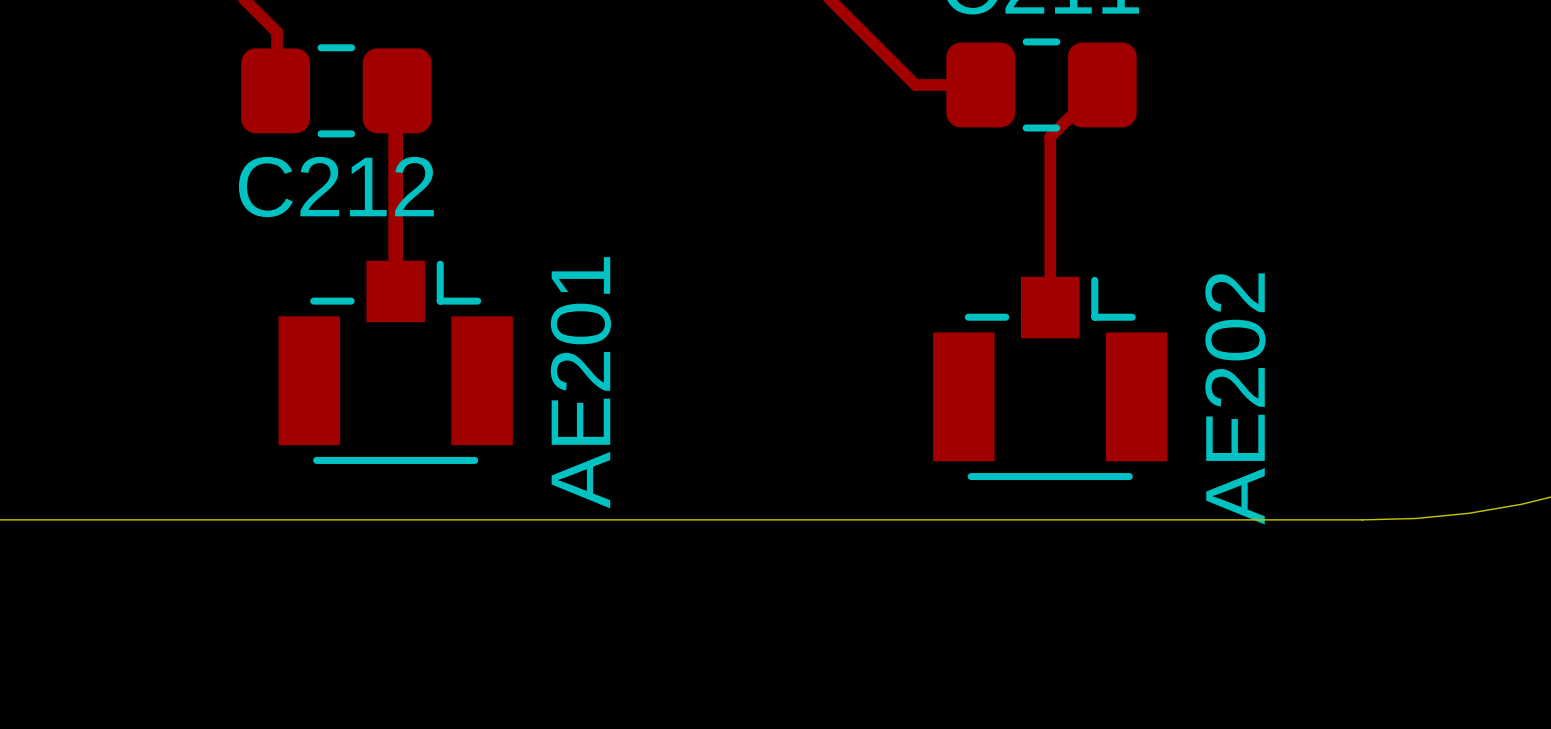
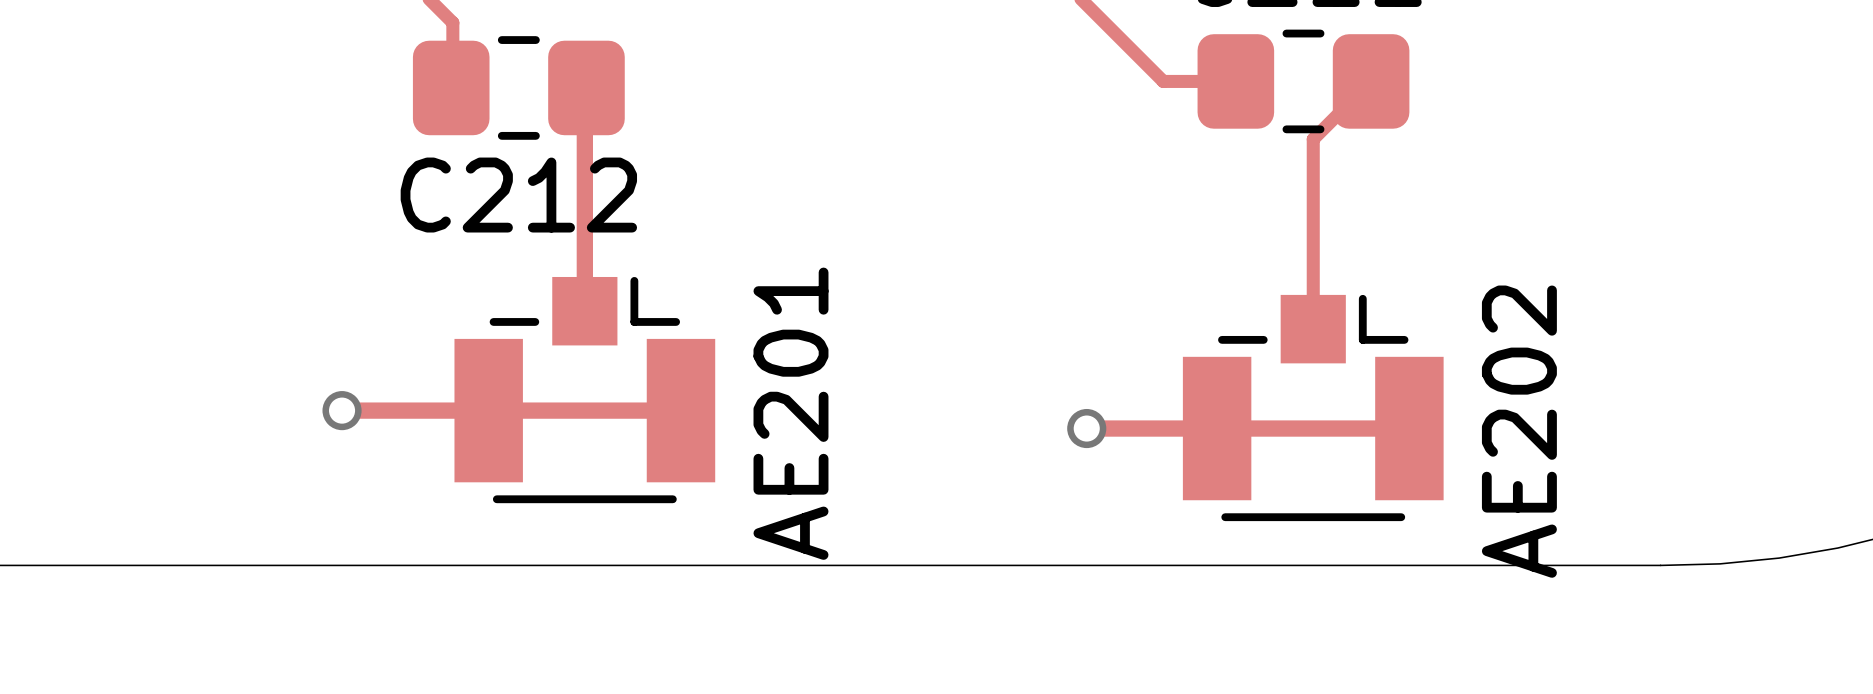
top track: none -> (342, 410) (680, 410)
via: none -> (342, 410)
top track: none -> (1083, 428) (1409, 428)
via: none -> (1086, 428)

